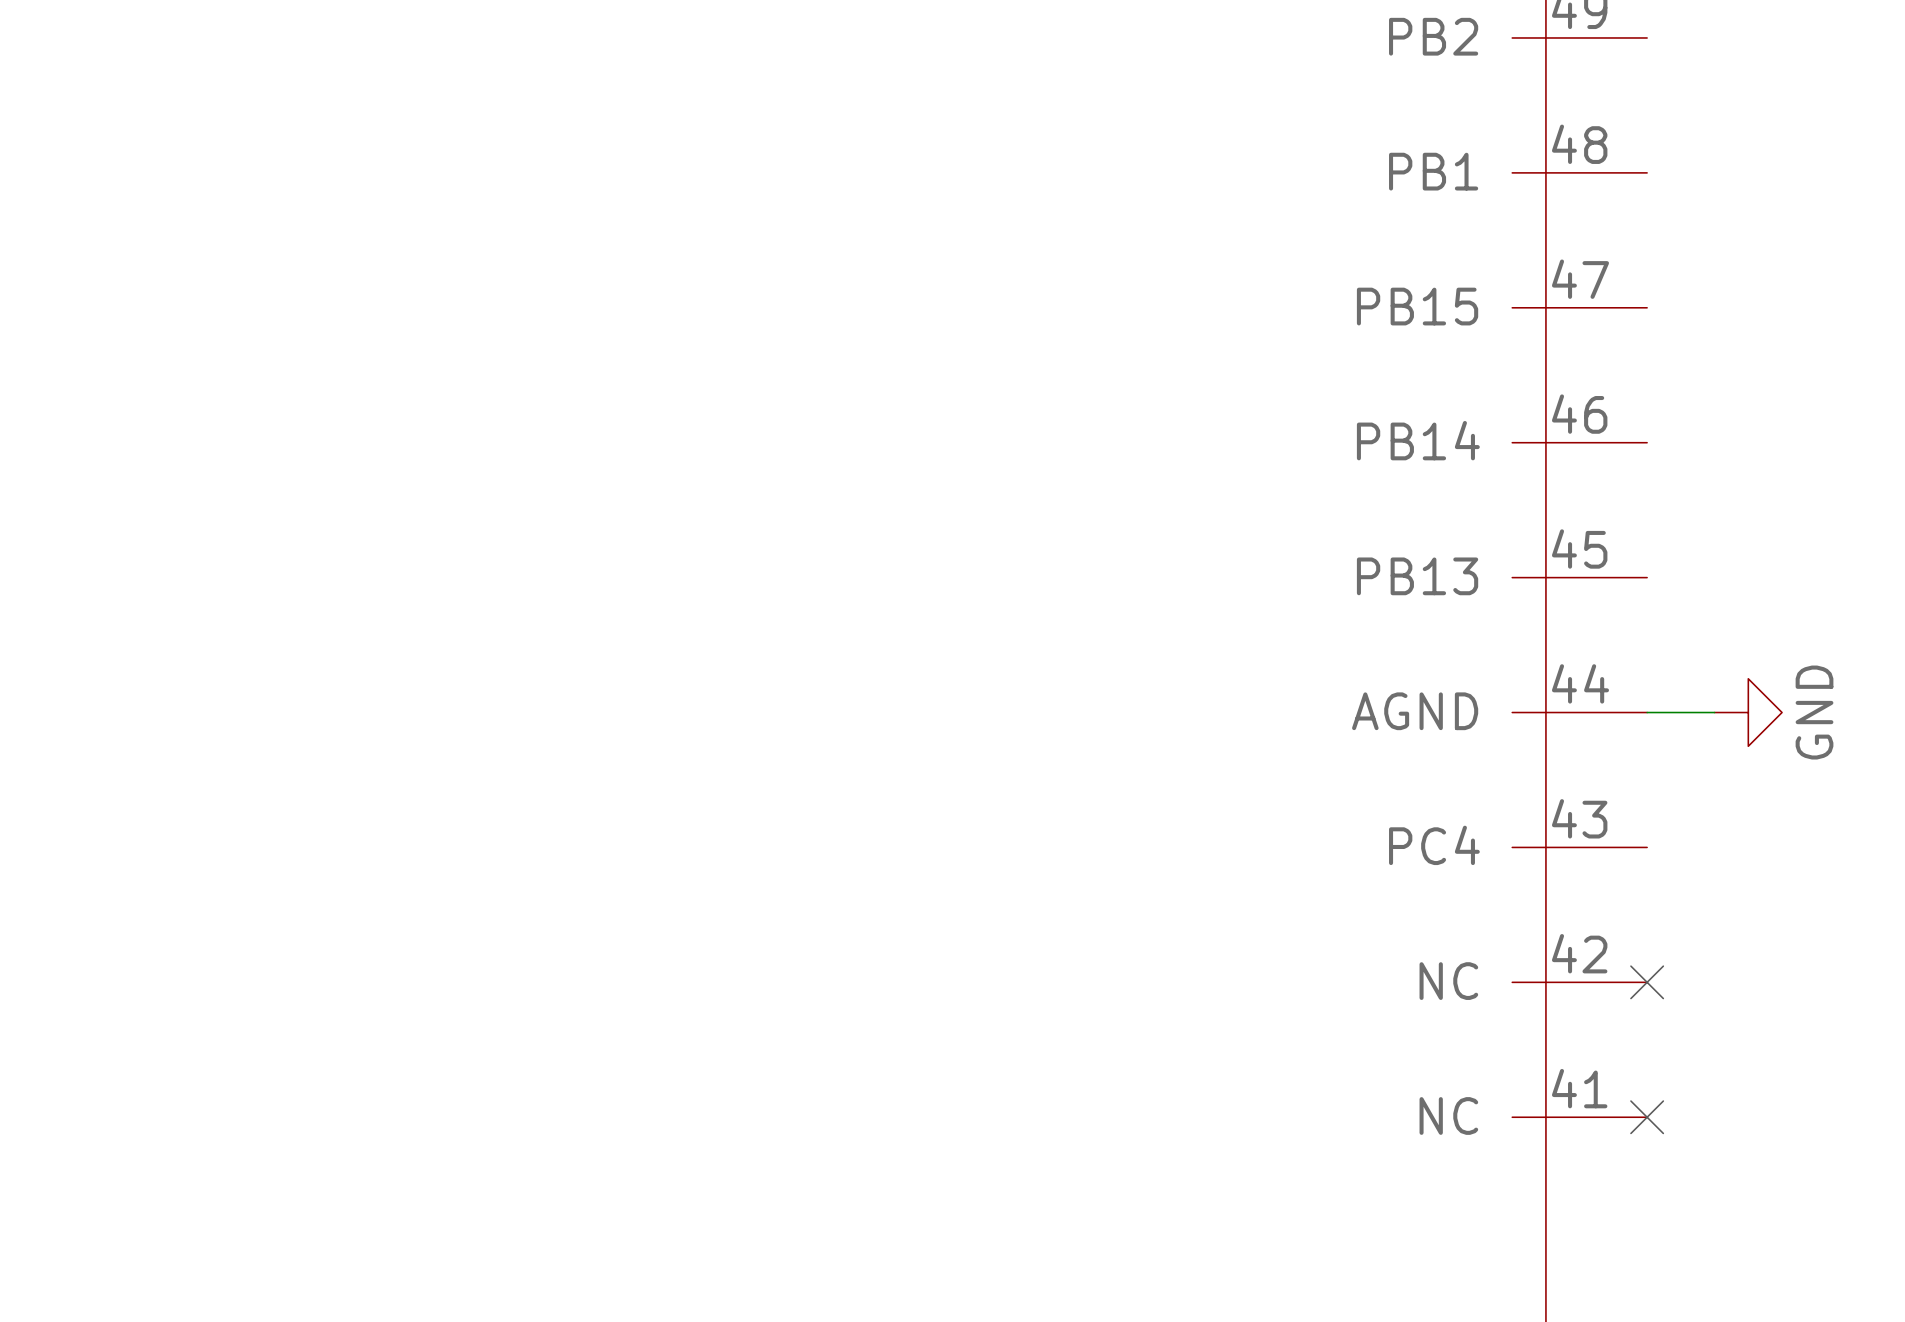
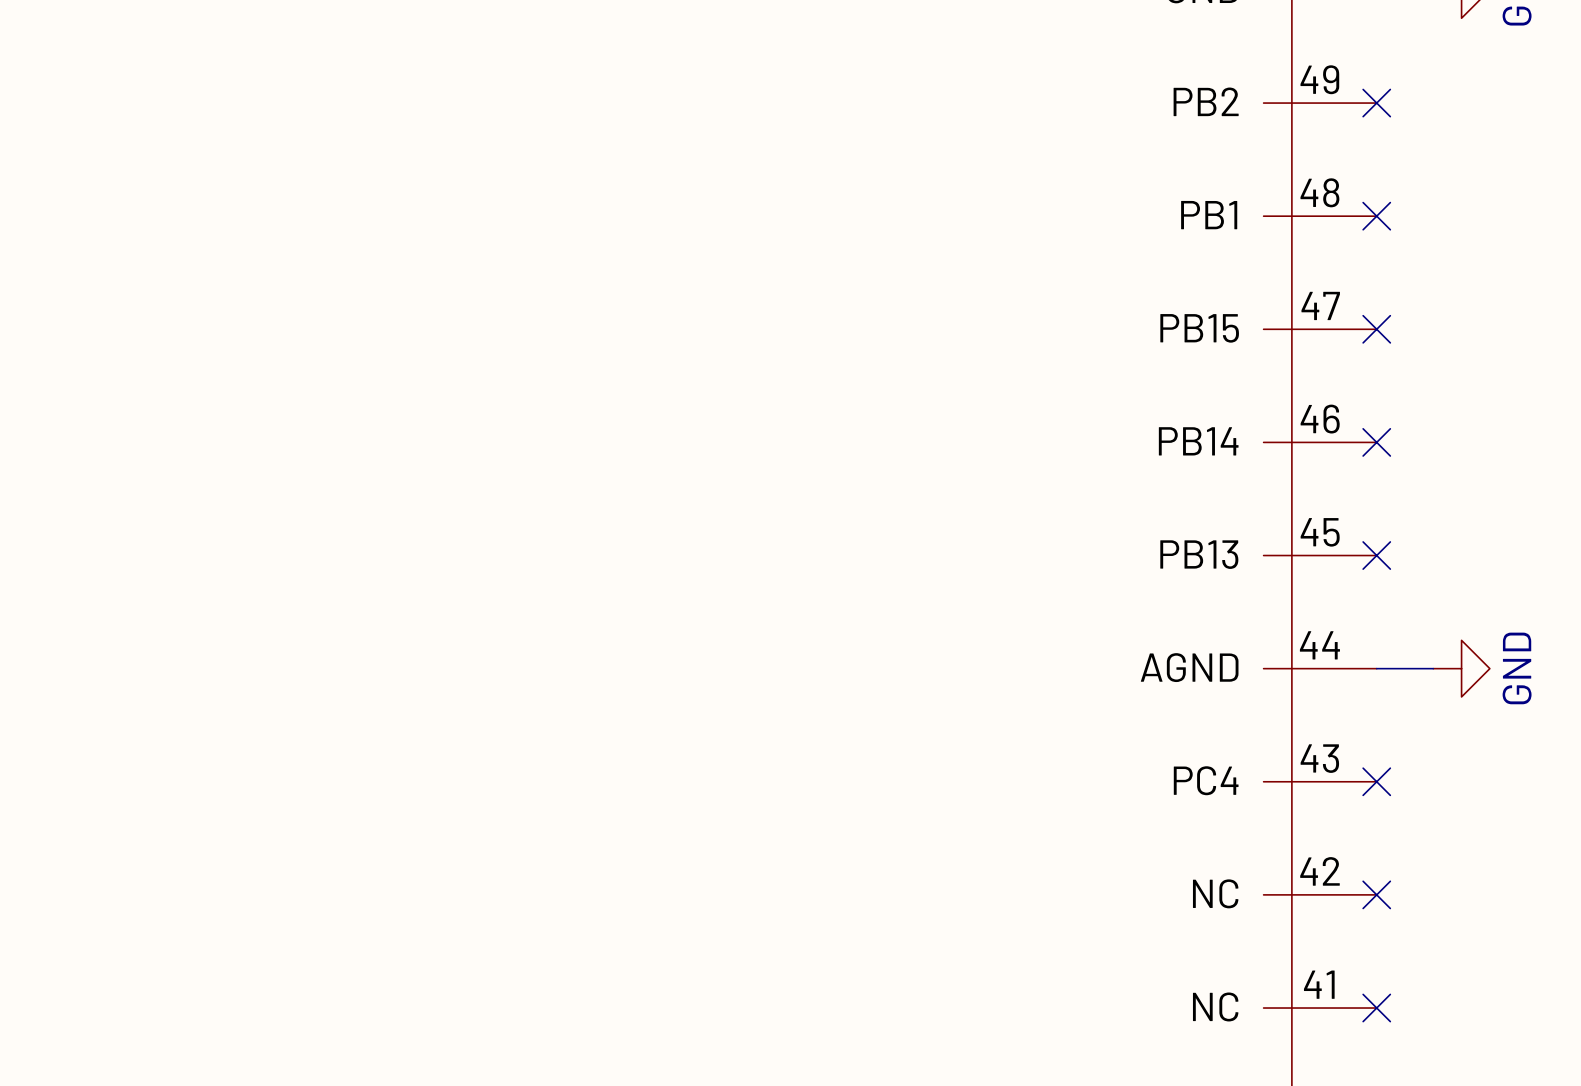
no-connect mark: none -> (1376, 103)
no-connect mark: none -> (1376, 216)
no-connect mark: none -> (1376, 329)
no-connect mark: none -> (1376, 442)
no-connect mark: none -> (1376, 555)
no-connect mark: none -> (1376, 781)

